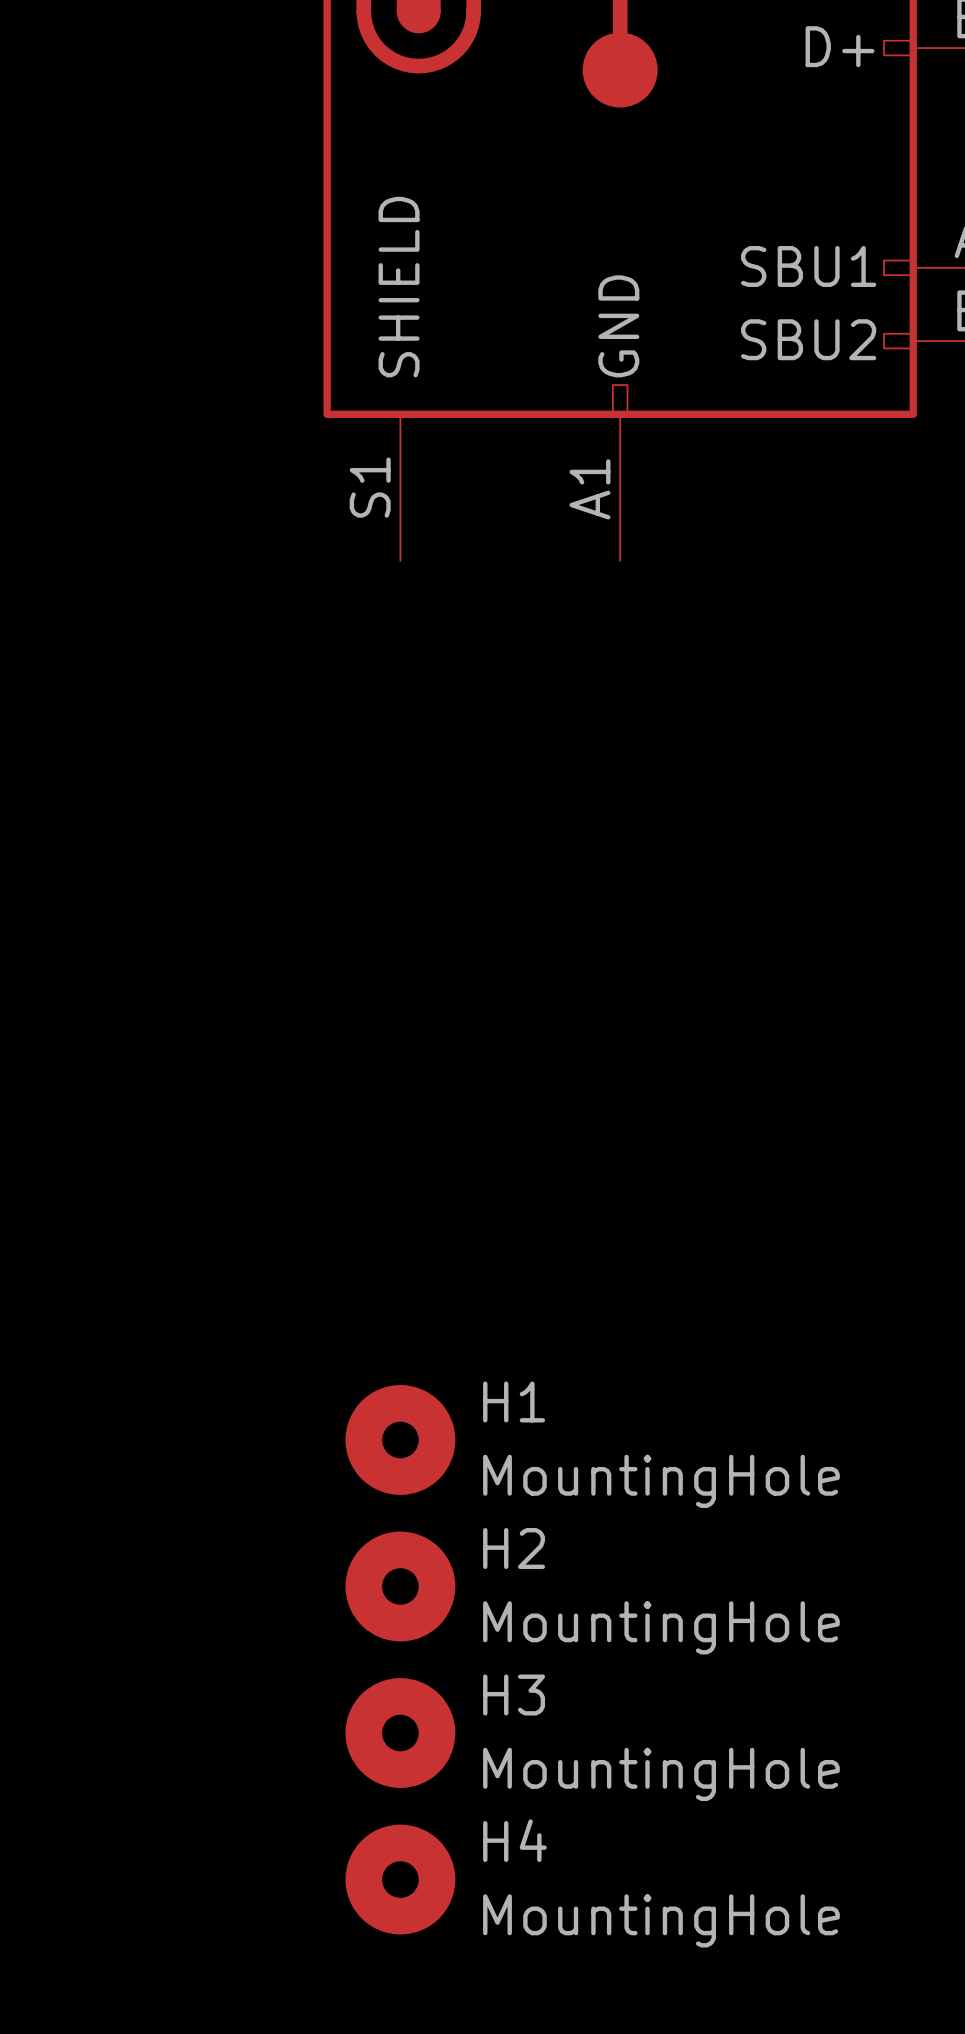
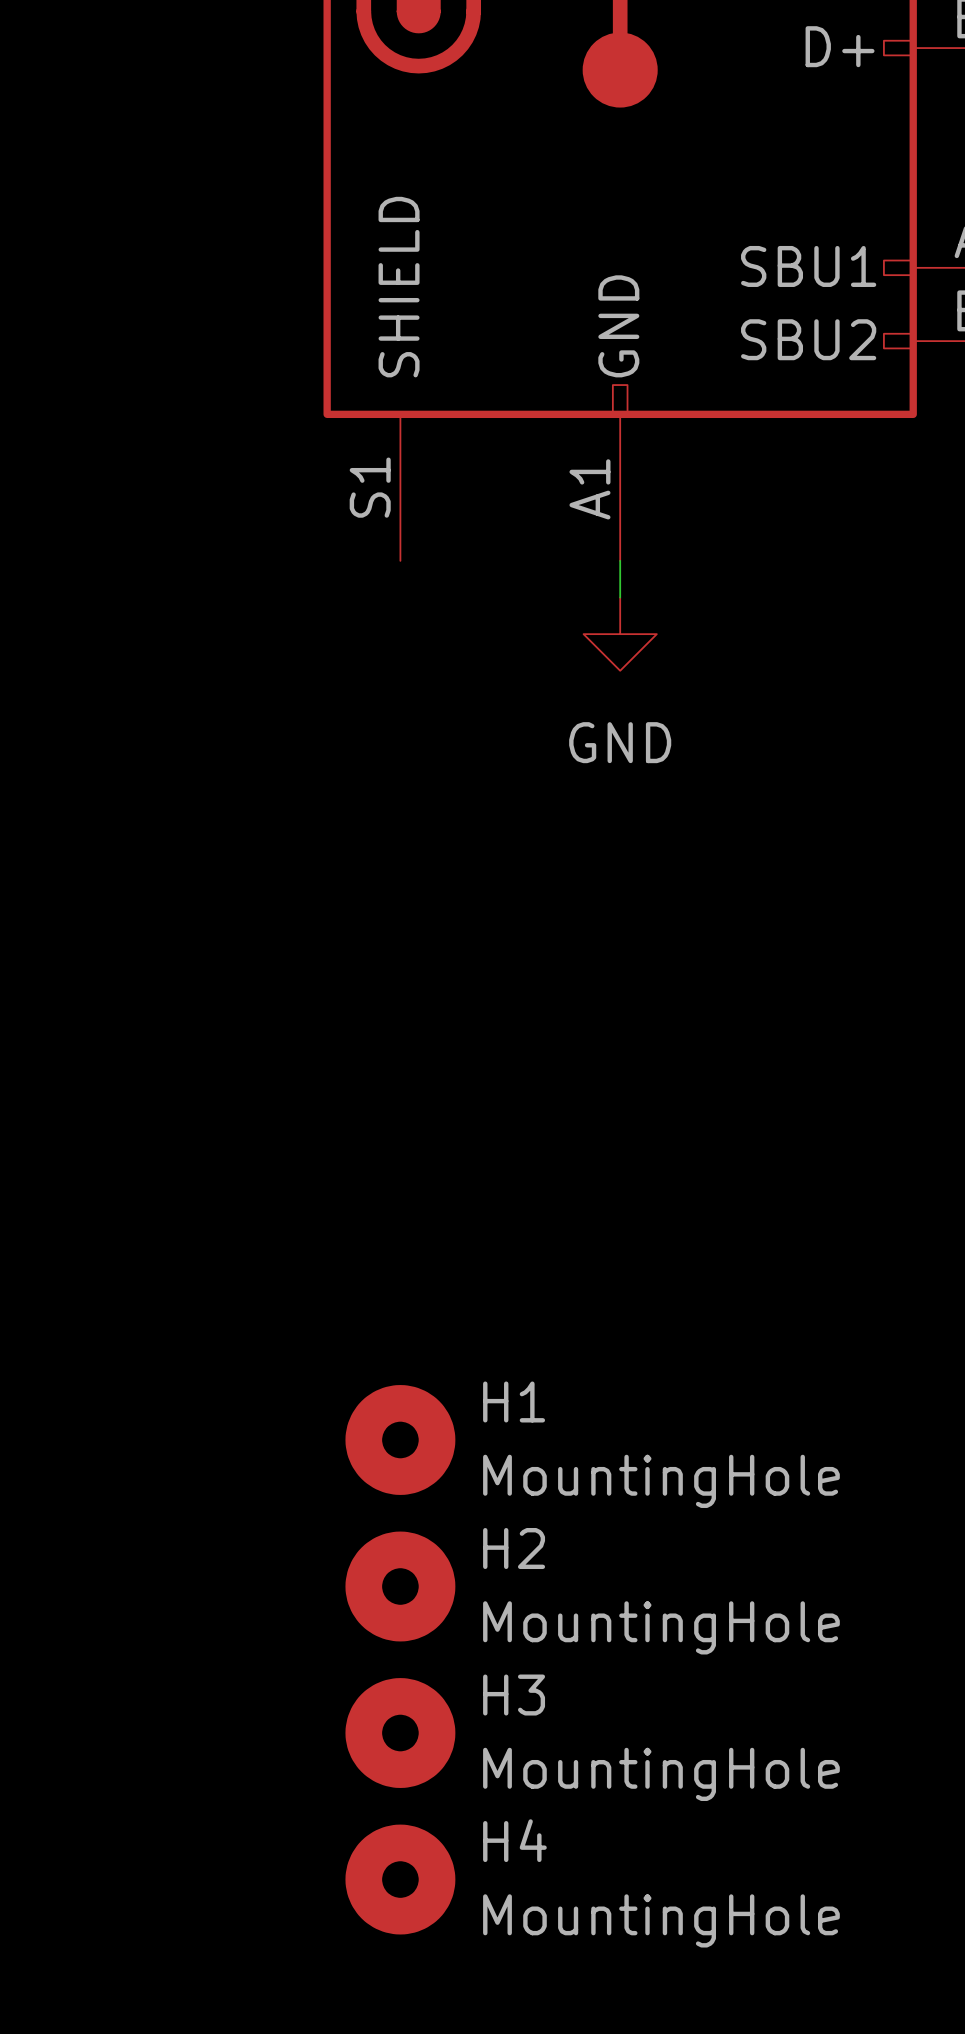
wire: none -> (620, 560) (620, 597)
power symbol: none -> GND (620, 634)

